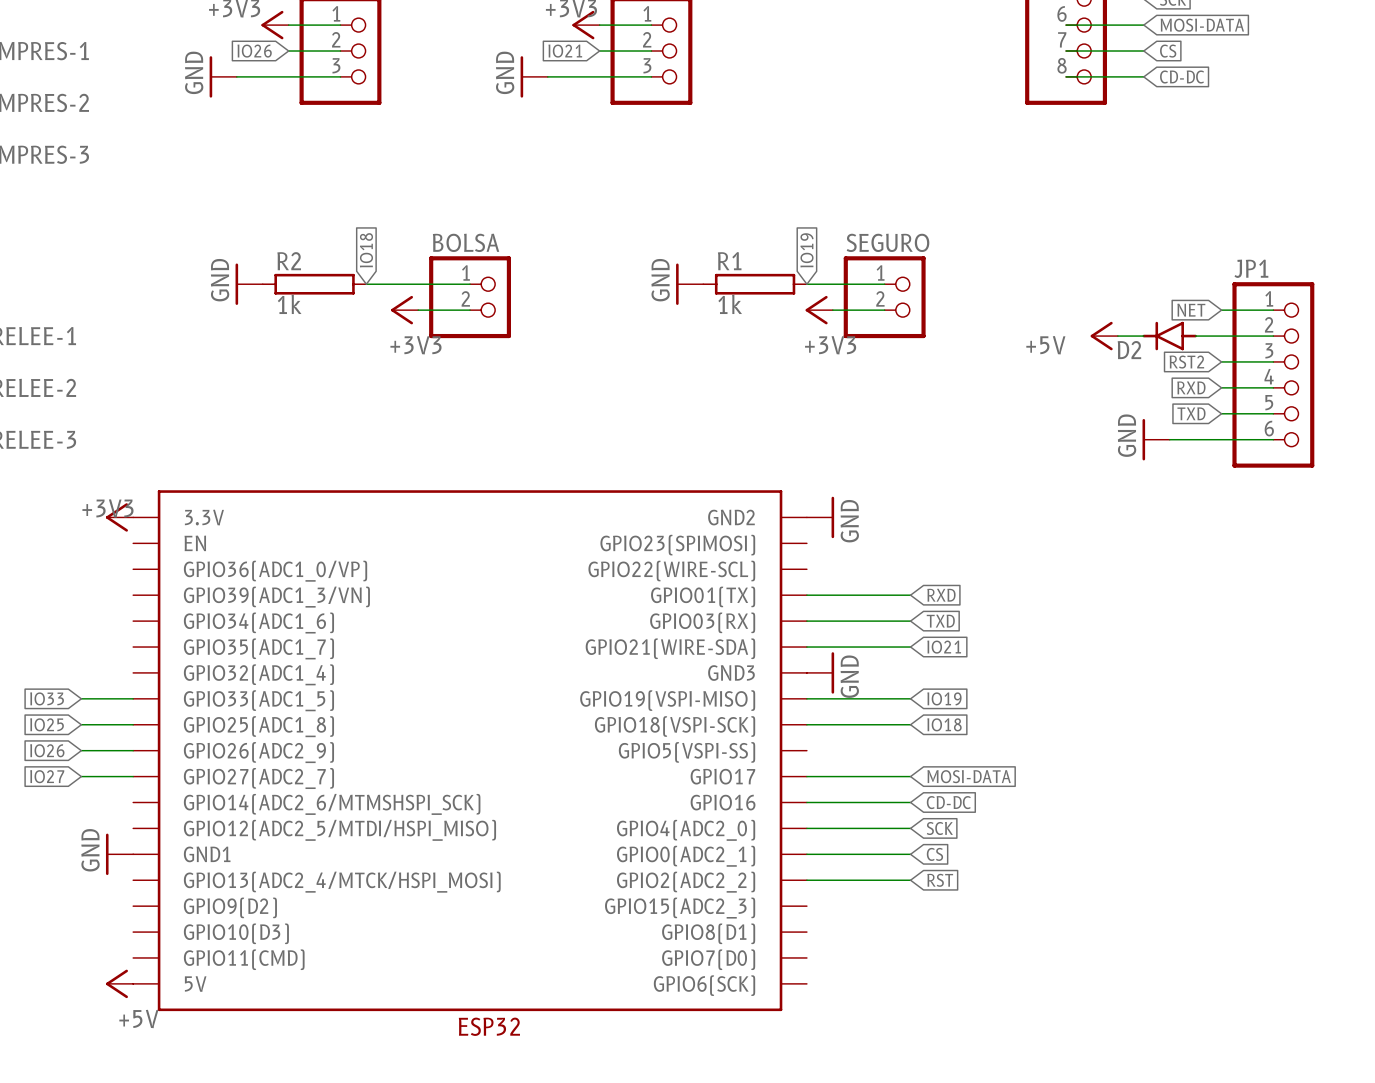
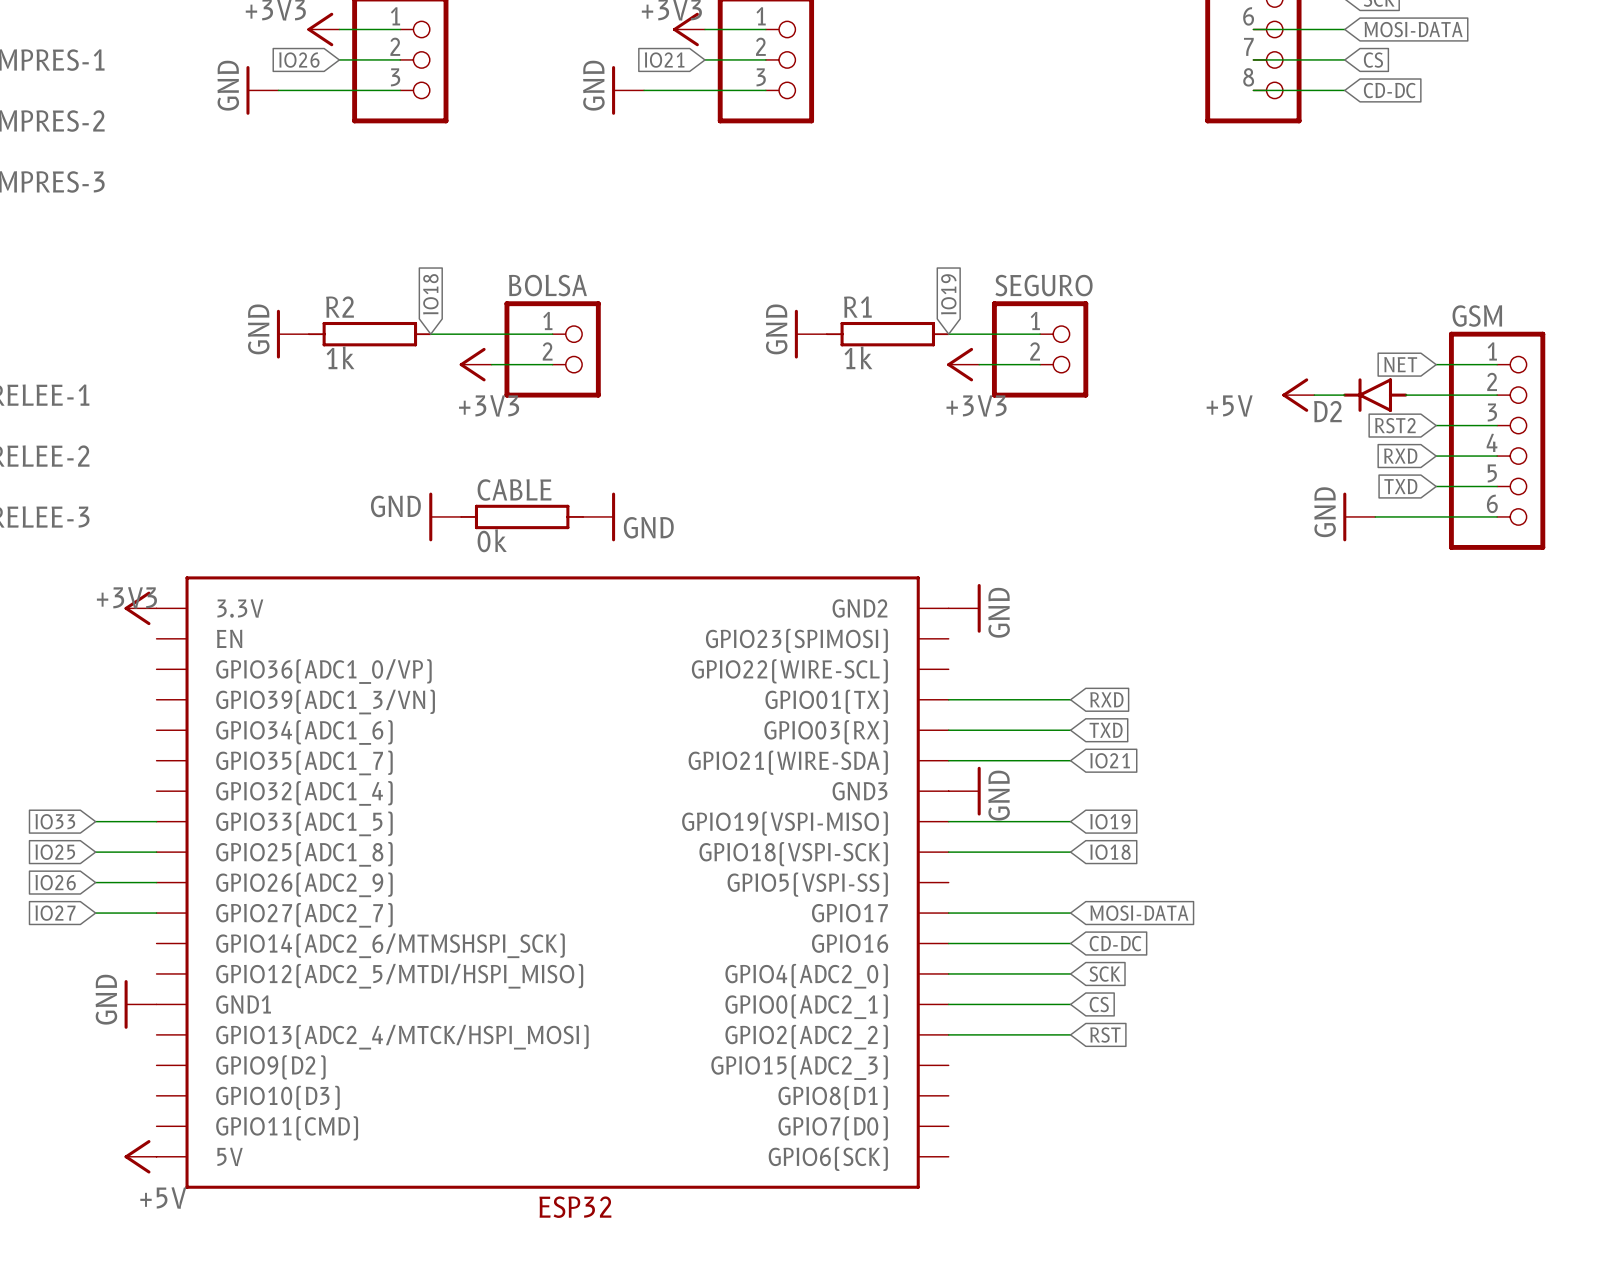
JP1 name: JP1 (1251, 268) -> GSM (1477, 316)
power symbol: none -> GND (445, 516)
CABLE: none -> 0k (522, 516)
power symbol: none -> GND (599, 516)

